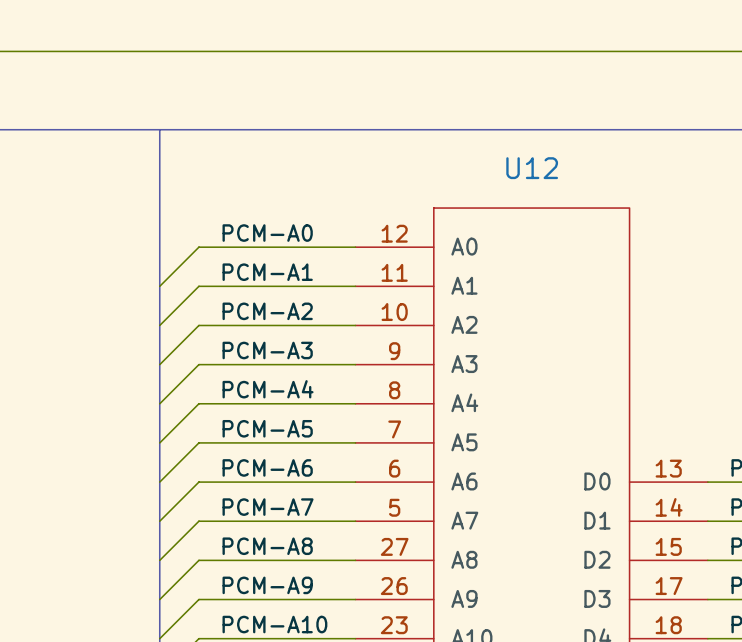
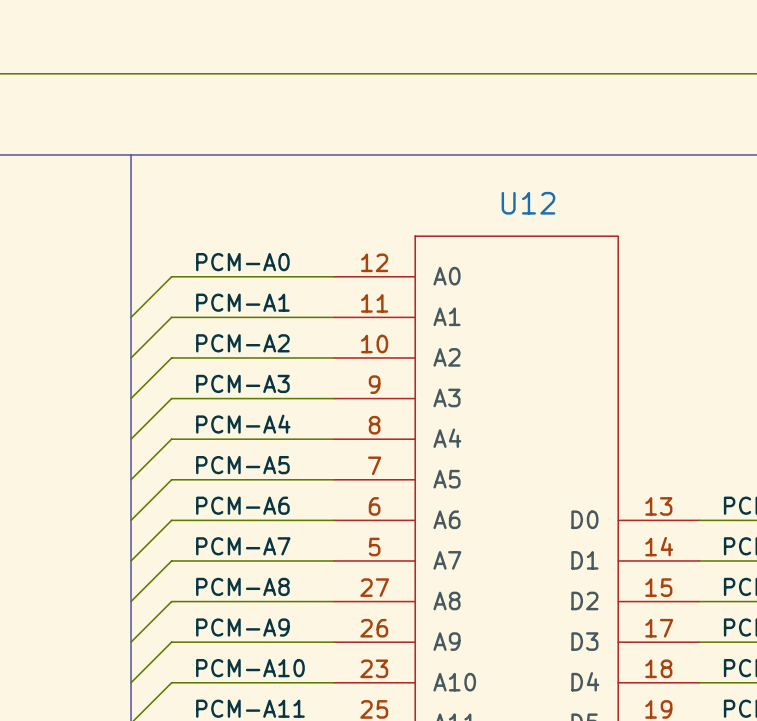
U12 name position: U12 (532, 168) -> U12 (528, 203)

